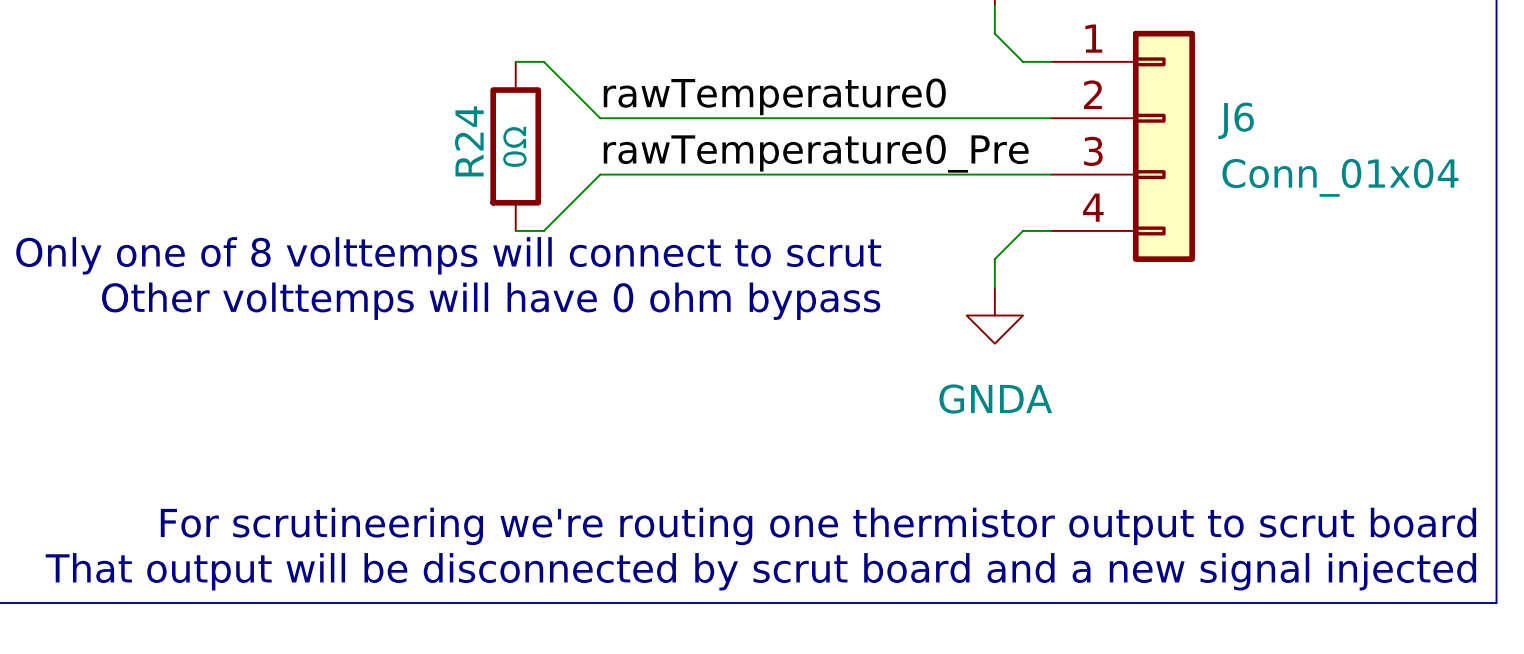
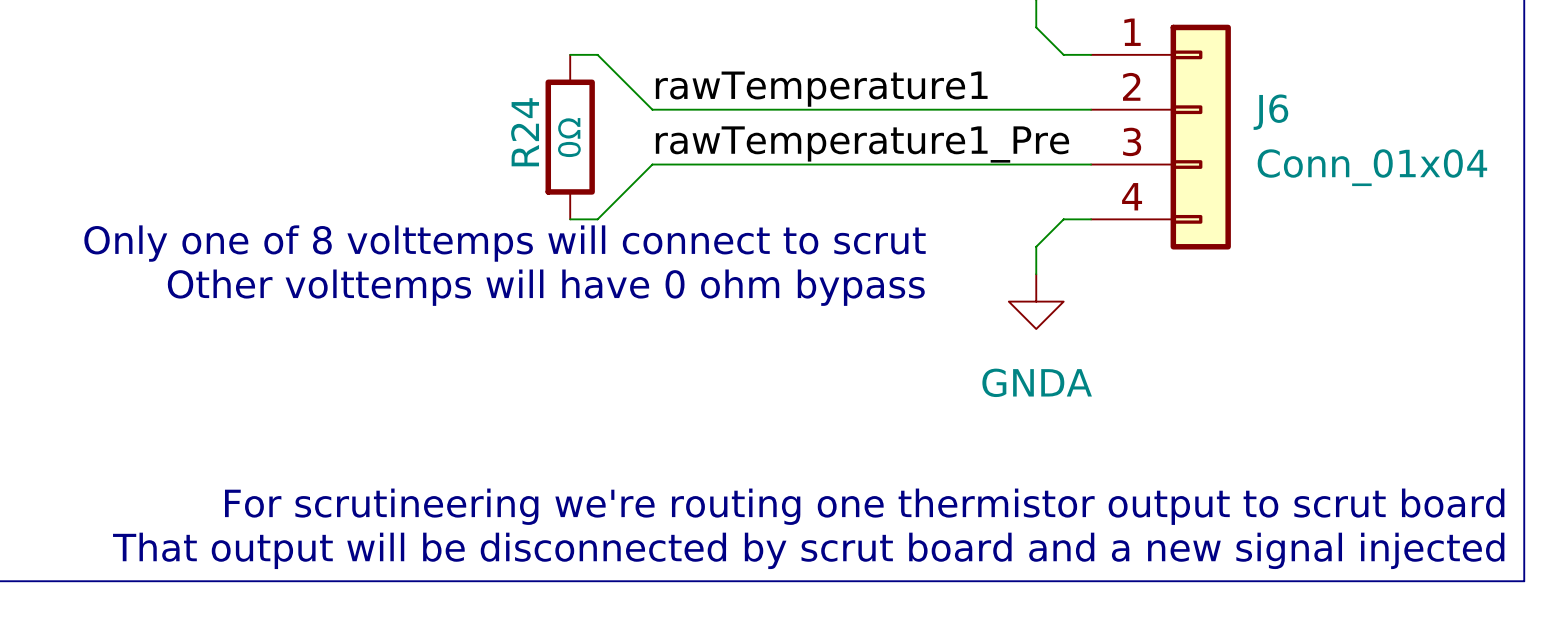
label: rawTemperature0 (774, 96) -> rawTemperature1 (821, 89)
label: rawTemperature0_Pre (816, 153) -> rawTemperature1_Pre (862, 144)

